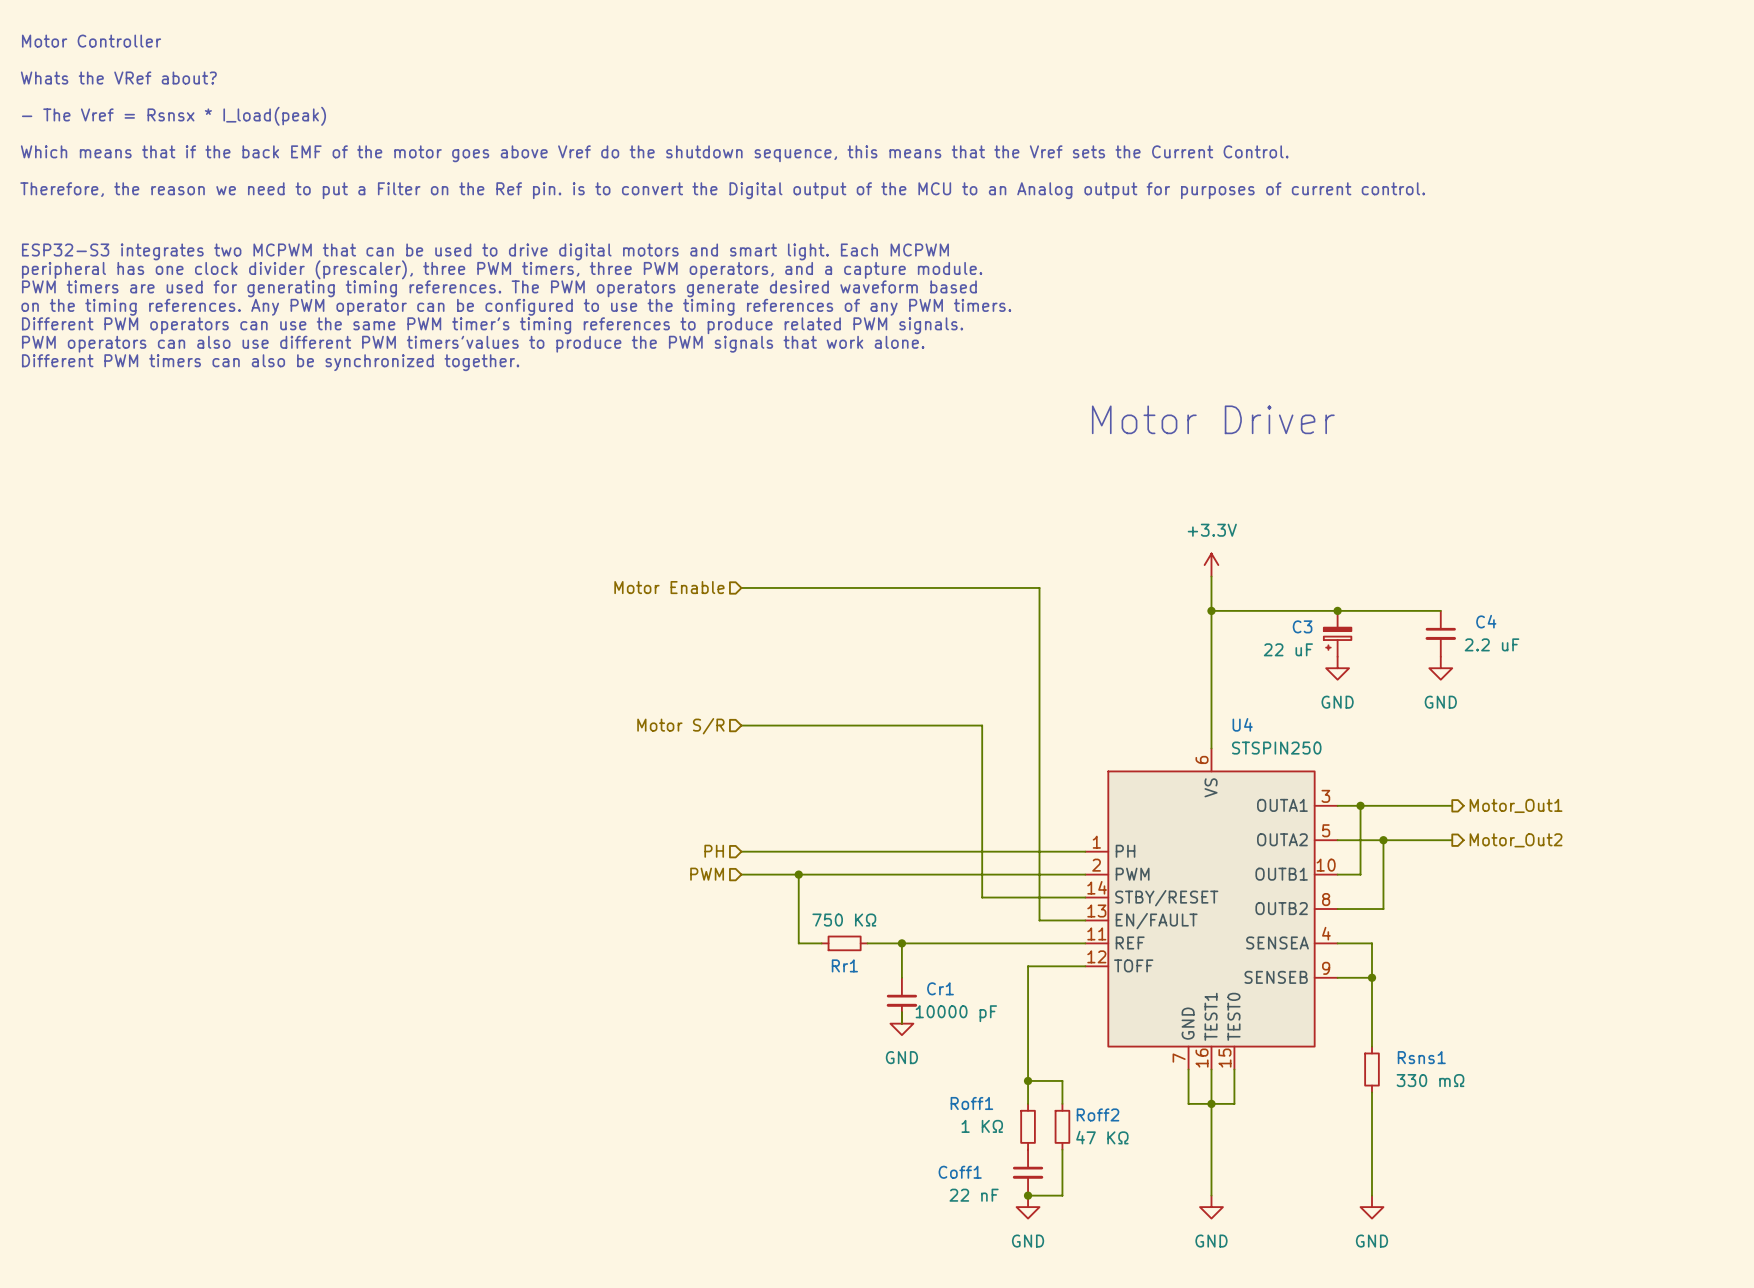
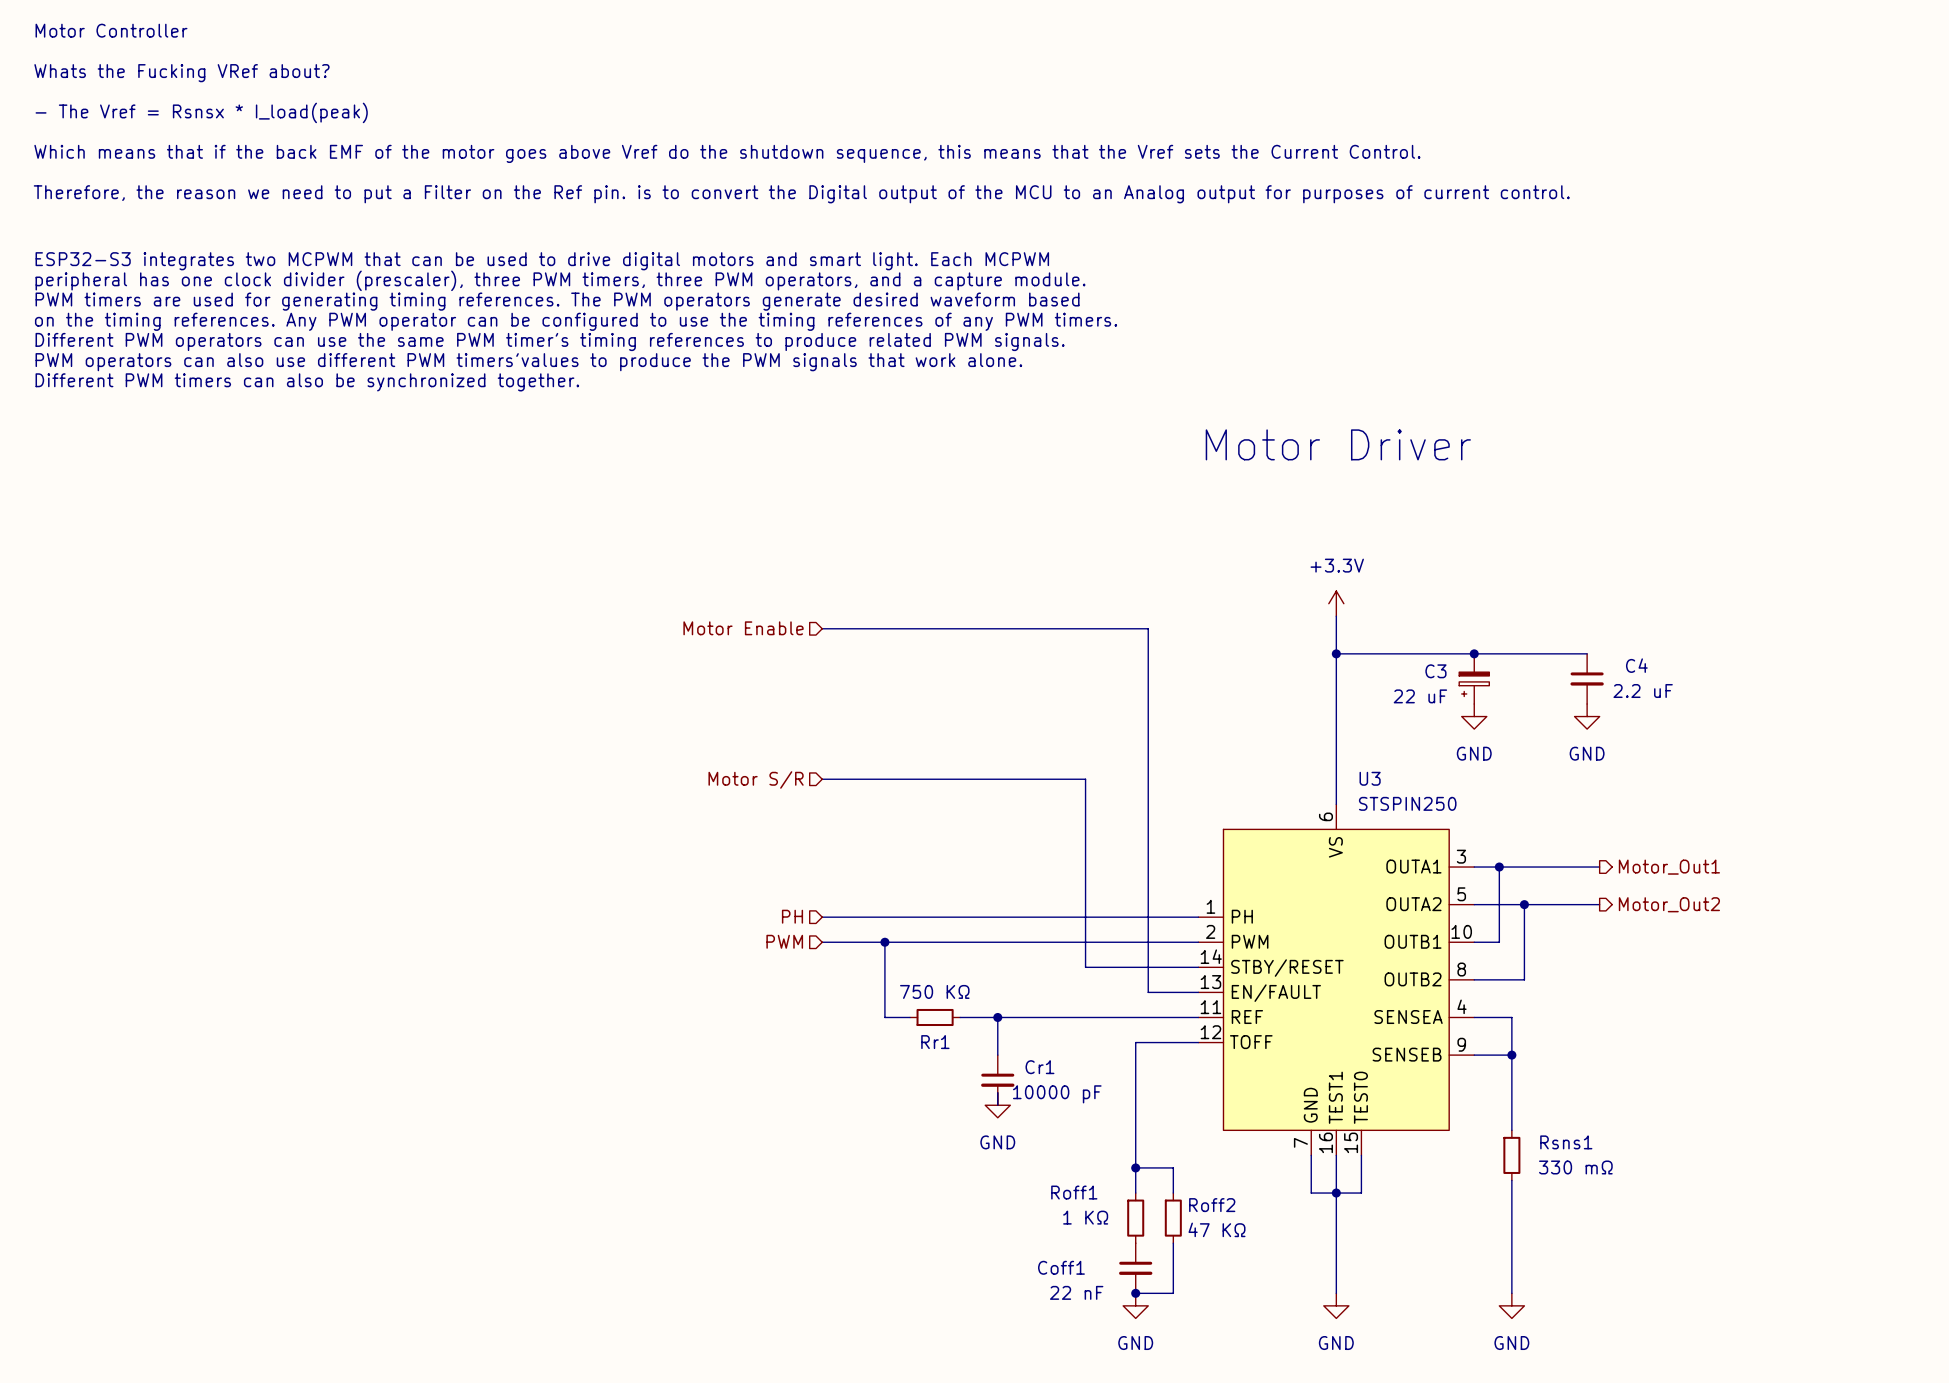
text: Whats the VRef about? (118, 78) -> Whats the Fucking VRef about? (181, 73)
U4 name: U4 (1242, 724) -> U3 (1370, 778)

